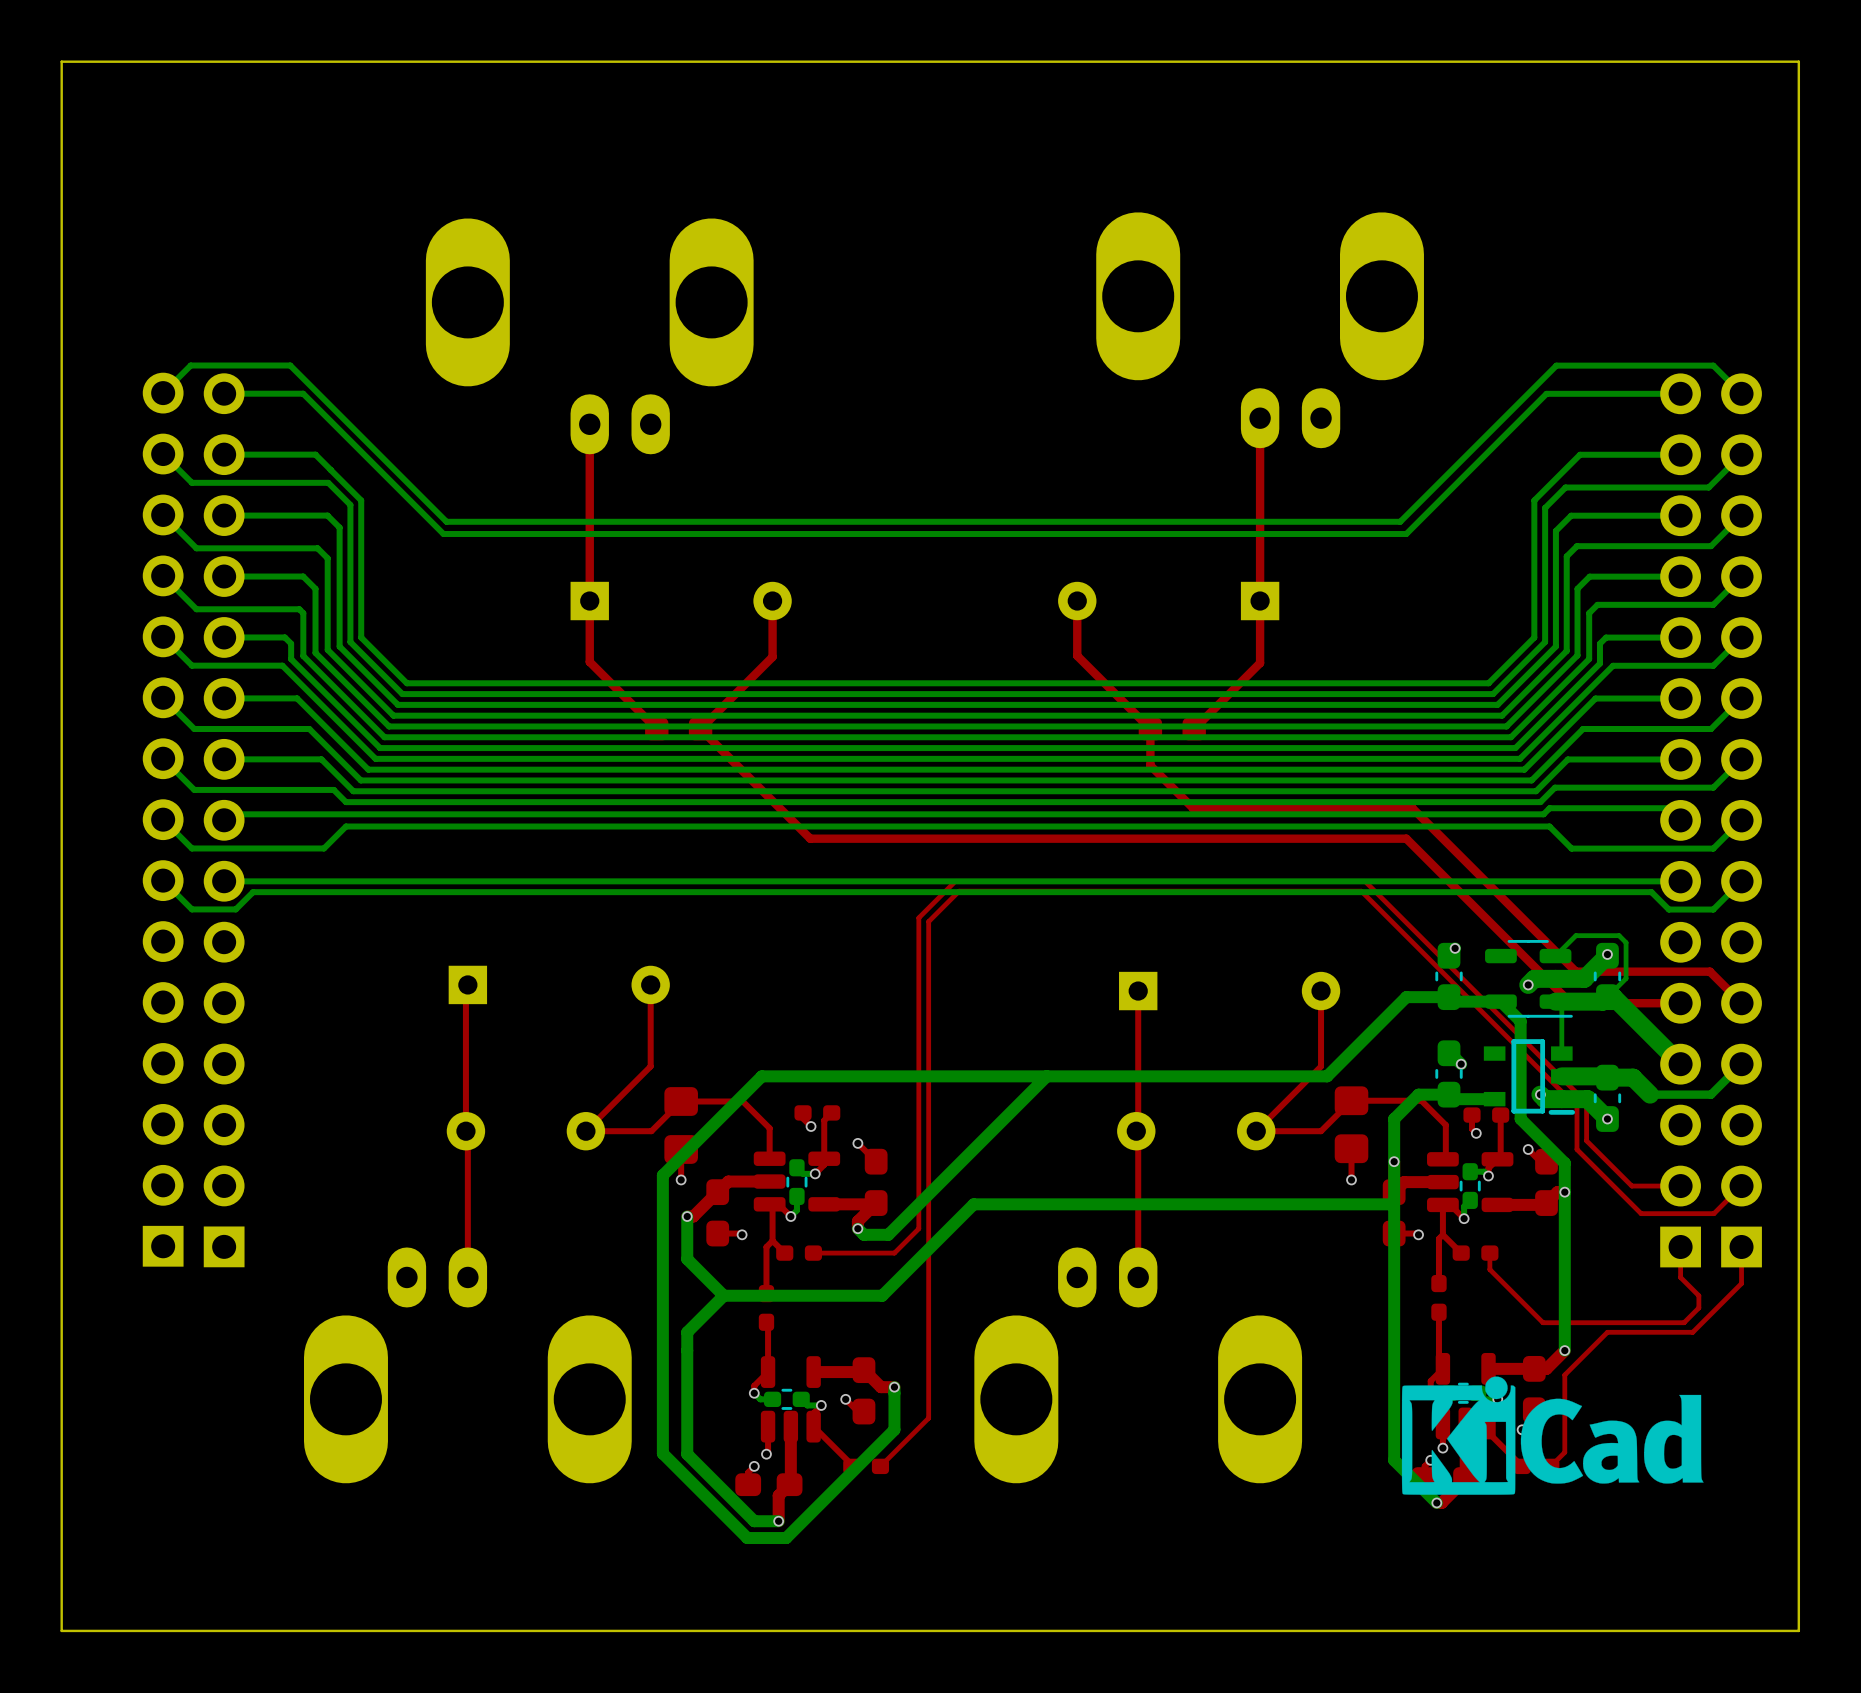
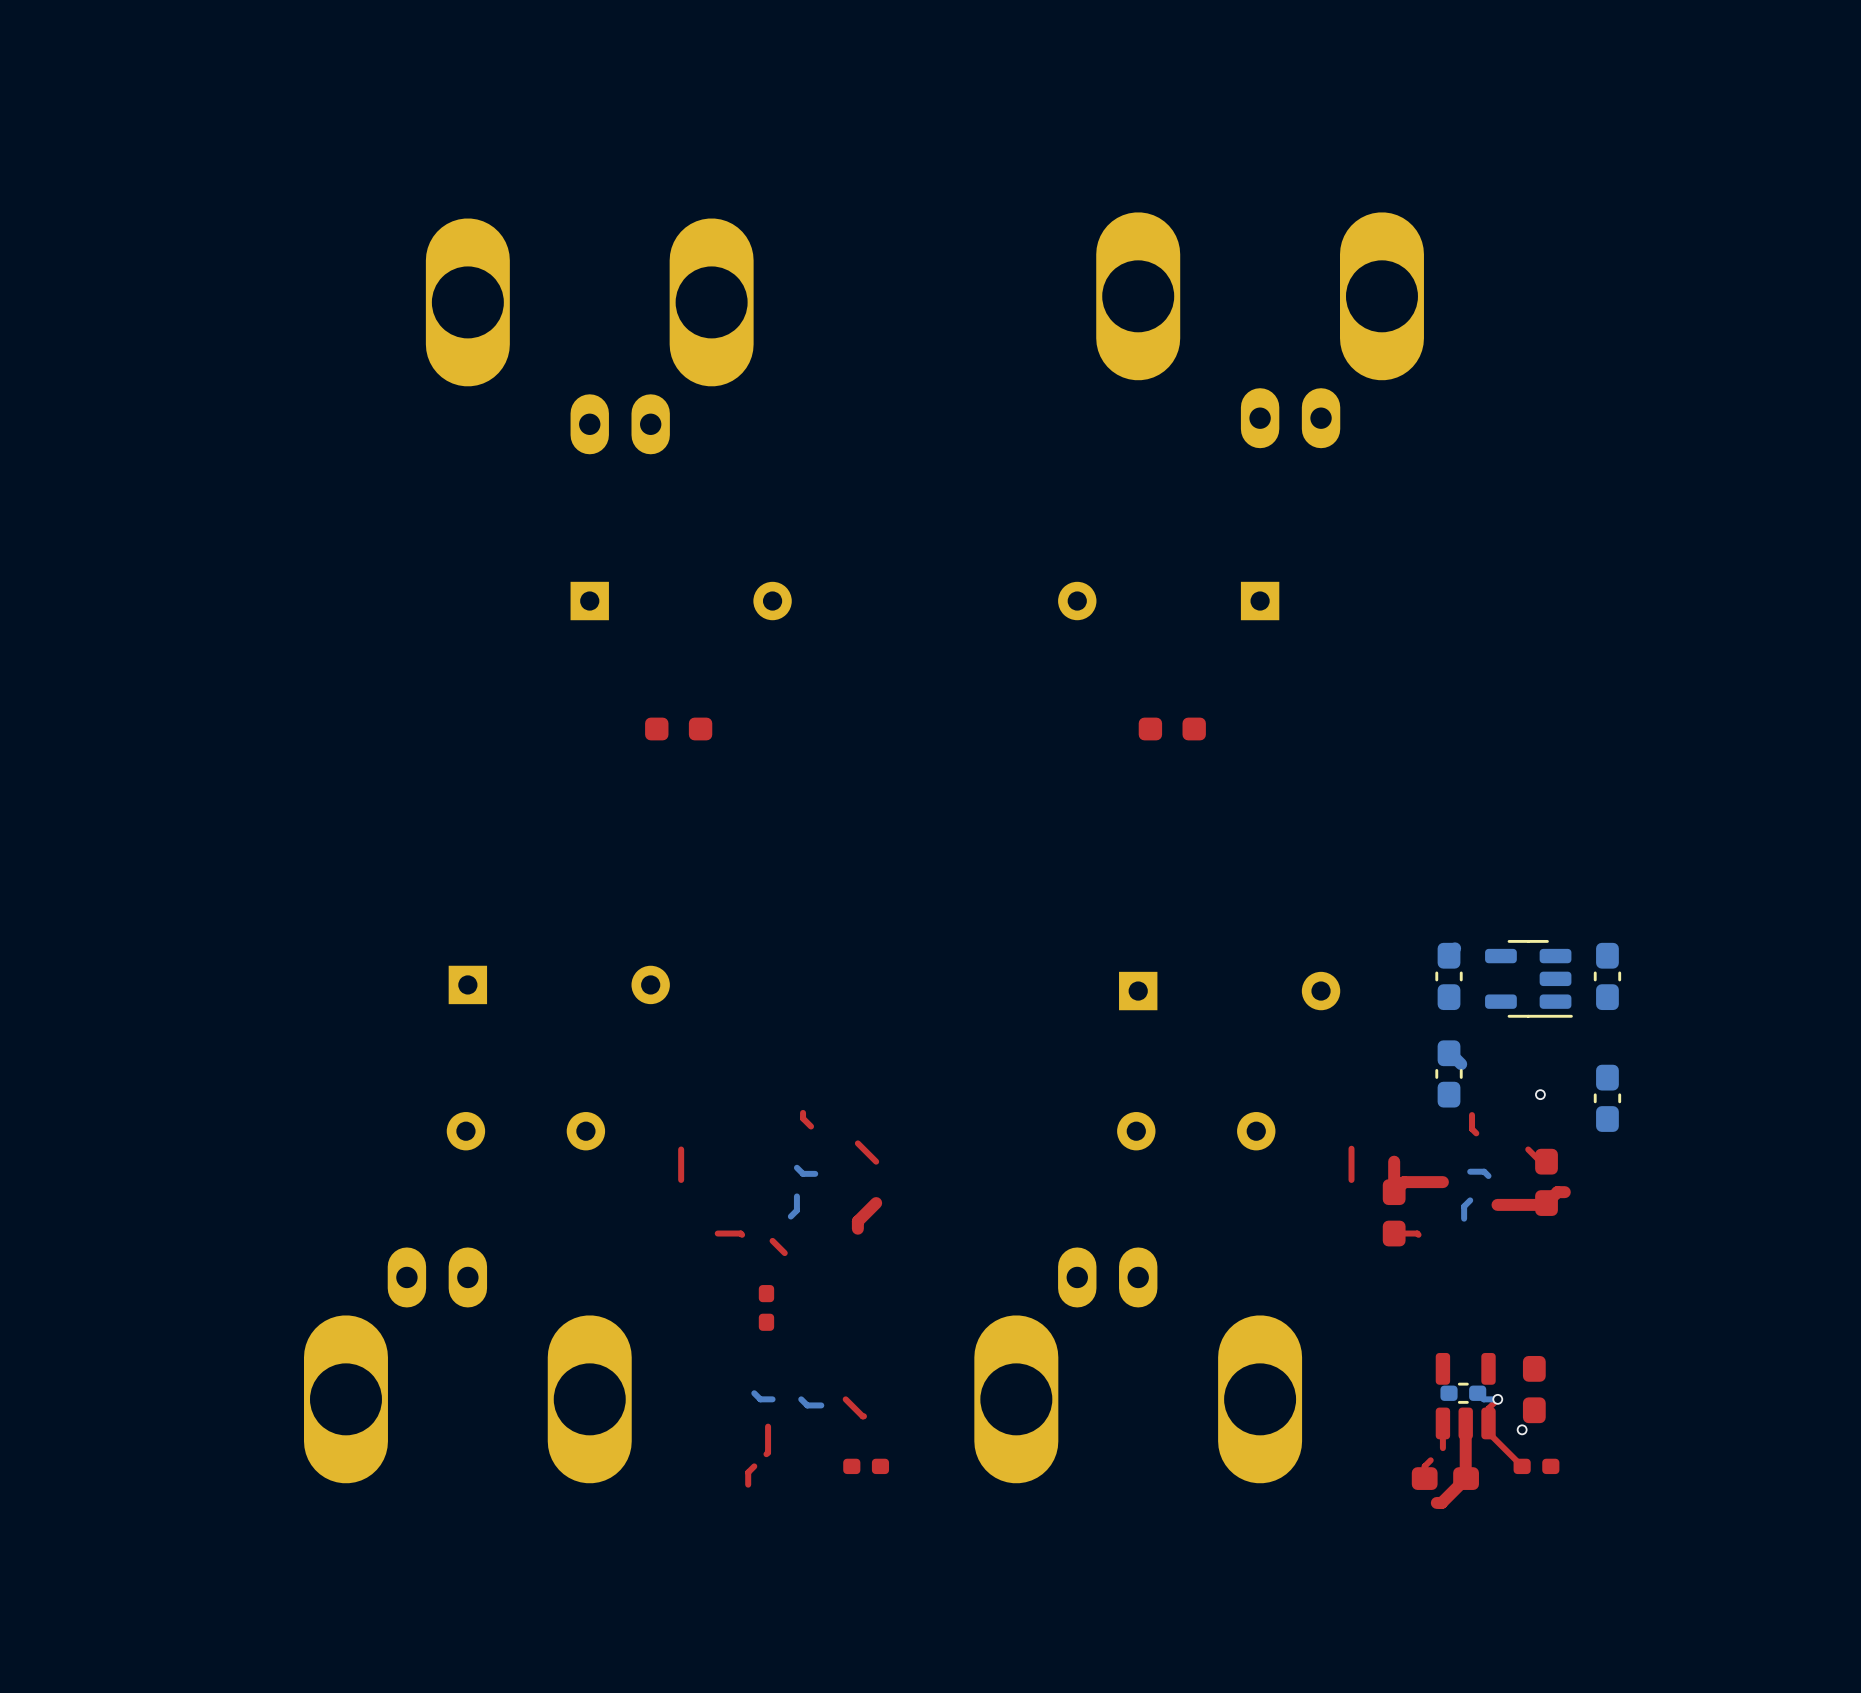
board edge: (1798, 61) (61, 61) (61, 1630) (1798, 1630) (1798, 61) -> none
bottom track: (163, 393) (190, 365) (290, 365) (446, 521) (1400, 521) (1556, 365) (1713, 365) (1741, 393) -> none
bottom track: (224, 393) (303, 393) (443, 533) (1406, 533) (1546, 393) (1680, 393) -> none
top track: (1260, 418) (1260, 663) (1194, 728) -> none
top track: (589, 424) (589, 661) (656, 728) -> none
bottom track: (163, 454) (191, 482) (328, 482) (350, 504) (350, 642) (402, 694) (1493, 694) (1545, 642) (1545, 507) (1565, 487) (1708, 487) (1741, 454) -> none
bottom track: (1680, 454) (1580, 454) (1534, 500) (1534, 637) (1488, 683) (406, 683) (361, 637) (361, 500) (315, 454) (224, 454) -> none
bottom track: (163, 514) (196, 548) (317, 548) (327, 558) (327, 649) (393, 715) (1502, 715) (1566, 651) (1566, 556) (1576, 546) (1711, 546) (1741, 515) -> none
bottom track: (224, 515) (327, 515) (339, 527) (339, 646) (397, 704) (1497, 704) (1555, 646) (1555, 530) (1571, 515) (1680, 515) -> none
bottom track: (163, 575) (196, 609) (299, 609) (303, 613) (303, 656) (384, 737) (1510, 737) (1589, 659) (1589, 613) (1597, 604) (1713, 604) (1741, 576) -> none
bottom track: (224, 576) (303, 576) (315, 588) (315, 652) (389, 726) (1506, 726) (1577, 655) (1577, 588) (1589, 576) (1680, 576) -> none
top track: (772, 601) (772, 656) (700, 728) (810, 838) (1406, 838) (1570, 1003) (1680, 1003) -> none
top track: (1077, 601) (1077, 655) (1150, 728) (1150, 765) (1193, 808) (1412, 808) (1575, 971) (1709, 971) (1741, 1003) -> none
bottom track: (163, 636) (191, 665) (282, 665) (375, 758) (1519, 758) (1613, 665) (1713, 665) (1741, 637) -> none
bottom track: (1680, 637) (1606, 637) (1599, 643) (1599, 663) (1515, 748) (380, 748) (291, 659) (291, 643) (284, 637) (224, 637) -> none
bottom track: (163, 697) (194, 728) (309, 728) (360, 780) (1531, 780) (1583, 728) (1711, 728) (1741, 698) -> none
bottom track: (224, 698) (297, 698) (368, 769) (1524, 769) (1595, 698) (1680, 698) -> none
bottom track: (163, 758) (194, 789) (333, 789) (345, 802) (1540, 802) (1554, 787) (1713, 787) (1741, 759) -> none
bottom track: (1680, 759) (1567, 759) (1536, 791) (353, 791) (321, 759) (224, 759) -> none
bottom track: (163, 819) (191, 848) (324, 848) (345, 826) (1549, 826) (1571, 848) (1713, 848) (1741, 820) -> none
part: (163, 819) -> none
bottom track: (224, 820) (230, 814) (1543, 814) (1549, 808) (1668, 808) (1680, 820) -> none
part: (224, 820) -> none
part: (1680, 820) -> none
part: (1741, 820) -> none
bottom track: (163, 880) (191, 909) (235, 909) (253, 892) (1651, 892) (1668, 909) (1713, 909) (1741, 881) -> none
bottom track: (1680, 881) (224, 881) -> none
via: (1455, 948) -> none
via: (1607, 954) -> none
bottom track: (1607, 955) (1607, 954) (1608, 954) (1584, 978) (1534, 978) (1528, 984) -> none
bottom track: (1555, 956) (1575, 935) (1619, 935) (1626, 942) (1626, 978) (1607, 997) -> none
top track: (467, 984) (465, 986) (467, 1277) -> none
top track: (650, 984) (650, 1066) (585, 1131) (651, 1131) (681, 1101) (742, 1101) (769, 1128) (769, 1158) -> none
via: (1528, 984) -> none
top track: (1138, 991) (1138, 1129) (1136, 1131) (1138, 1133) (1138, 1277) -> none
top track: (1321, 991) (1321, 1066) (1256, 1131) (1321, 1131) (1351, 1100) (1421, 1100) (1445, 1125) (1445, 1156) (1442, 1159) -> none
bottom track: (1607, 997) (1613, 997) (1680, 1064) -> none
bottom track: (1607, 997) (1602, 1001) (1555, 1001) (1561, 1007) (1561, 1053) -> none
via: (1461, 1064) -> none
bottom track: (1741, 1064) (1711, 1094) (1650, 1094) (1633, 1077) (1561, 1076) -> none
bottom track: (1046, 1076) (888, 1234) (863, 1234) (857, 1228) -> none
part: (1529, 1076) -> none
bottom track: (1540, 1094) (1544, 1099) (1587, 1099) (1607, 1119) -> none
bottom track: (1494, 1099) (1453, 1099) (1449, 1094) (1418, 1094) (1394, 1119) (1394, 1460) (1436, 1502) -> none
part: (817, 1112) -> none
top track: (831, 1112) (824, 1120) (824, 1164) (815, 1173) -> none
part: (1486, 1115) -> none
top track: (1500, 1115) (1500, 1156) (1488, 1168) (1488, 1176) -> none
via: (1607, 1119) -> none
part: (1351, 1124) -> none
part: (681, 1125) -> none
via: (811, 1126) -> none
via: (1476, 1133) -> none
via: (857, 1143) -> none
via: (1528, 1149) -> none
via: (1394, 1161) -> none
via: (815, 1173) -> none
via: (1488, 1176) -> none
via: (681, 1179) -> none
via: (1351, 1179) -> none
top track: (769, 1181) (728, 1181) (693, 1216) (687, 1216) -> none
part: (796, 1181) -> none
part: (796, 1182) -> none
part: (876, 1182) -> none
part: (1470, 1182) -> none
part: (1470, 1186) -> none
top track: (1680, 1186) (1631, 1186) (1586, 1140) (1586, 1102) (1365, 881) (955, 881) (918, 917) (918, 1228) (894, 1253) (813, 1253) -> none
top track: (1741, 1186) (1713, 1213) (1641, 1213) (1576, 1149) (1576, 1106) (1361, 891) (959, 891) (928, 921) (928, 1418) (880, 1466) -> none
via: (1564, 1192) -> none
top track: (874, 1204) (824, 1204) -> none
bottom track: (1394, 1204) (973, 1204) (882, 1295) (723, 1295) -> none
part: (717, 1212) -> none
bottom track: (687, 1216) (687, 1259) (723, 1295) -> none
via: (687, 1216) -> none
top track: (790, 1216) (778, 1204) (769, 1204) (772, 1207) (772, 1240) (766, 1246) (766, 1293) -> none
via: (790, 1216) -> none
top track: (1464, 1218) (1450, 1204) (1442, 1204) (1442, 1234) -> none
via: (1464, 1218) -> none
via: (857, 1228) -> none
via: (742, 1234) -> none
via: (1418, 1234) -> none
top track: (1442, 1234) (1461, 1253) -> none
top track: (1442, 1234) (1438, 1238) (1438, 1283) -> none
top track: (1680, 1246) (1680, 1277) (1698, 1295) (1698, 1307) (1684, 1322) (1543, 1322) (1489, 1269) (1489, 1253) -> none
top track: (1741, 1246) (1741, 1283) (1692, 1332) (1607, 1332) (1564, 1374) (1564, 1452) (1550, 1466) -> none
part: (799, 1253) -> none
part: (1475, 1253) -> none
bottom track: (723, 1295) (687, 1332) (687, 1454) (754, 1521) (778, 1521) -> none
part: (1438, 1297) -> none
top track: (1438, 1312) (1438, 1364) (1442, 1368) (1430, 1381) (1430, 1393) -> none
top track: (766, 1322) (768, 1323) (768, 1372) (754, 1385) (754, 1393) -> none
top track: (1564, 1350) (1546, 1368) (1488, 1368) -> none
bottom track: (1564, 1350) (1564, 1163) (1520, 1118) (1520, 1021) (1500, 1001) (1453, 1001) (1449, 997) (1406, 997) (1327, 1076) (761, 1076) (662, 1175) (662, 1453) (747, 1538) (786, 1538) (894, 1429) (894, 1387) -> none
via: (1564, 1350) -> none
top track: (816, 1374) (813, 1372) (862, 1372) (863, 1370) (880, 1387) (894, 1387) -> none
drawing: [1401, 1376, 1704, 1495] -> none
via: (894, 1387) -> none
part: (863, 1390) -> none
via: (754, 1393) -> none
part: (786, 1399) -> none
part: (790, 1399) -> none
via: (845, 1399) -> none
top track: (821, 1405) (813, 1413) (813, 1426) (851, 1466) -> none
via: (821, 1405) -> none
top track: (789, 1427) (790, 1426) (790, 1483) (778, 1495) (778, 1521) -> none
via: (1442, 1448) -> none
via: (766, 1454) -> none
via: (1430, 1460) -> none
via: (754, 1466) -> none
part: (768, 1484) -> none
via: (1436, 1502) -> none
via: (778, 1521) -> none

